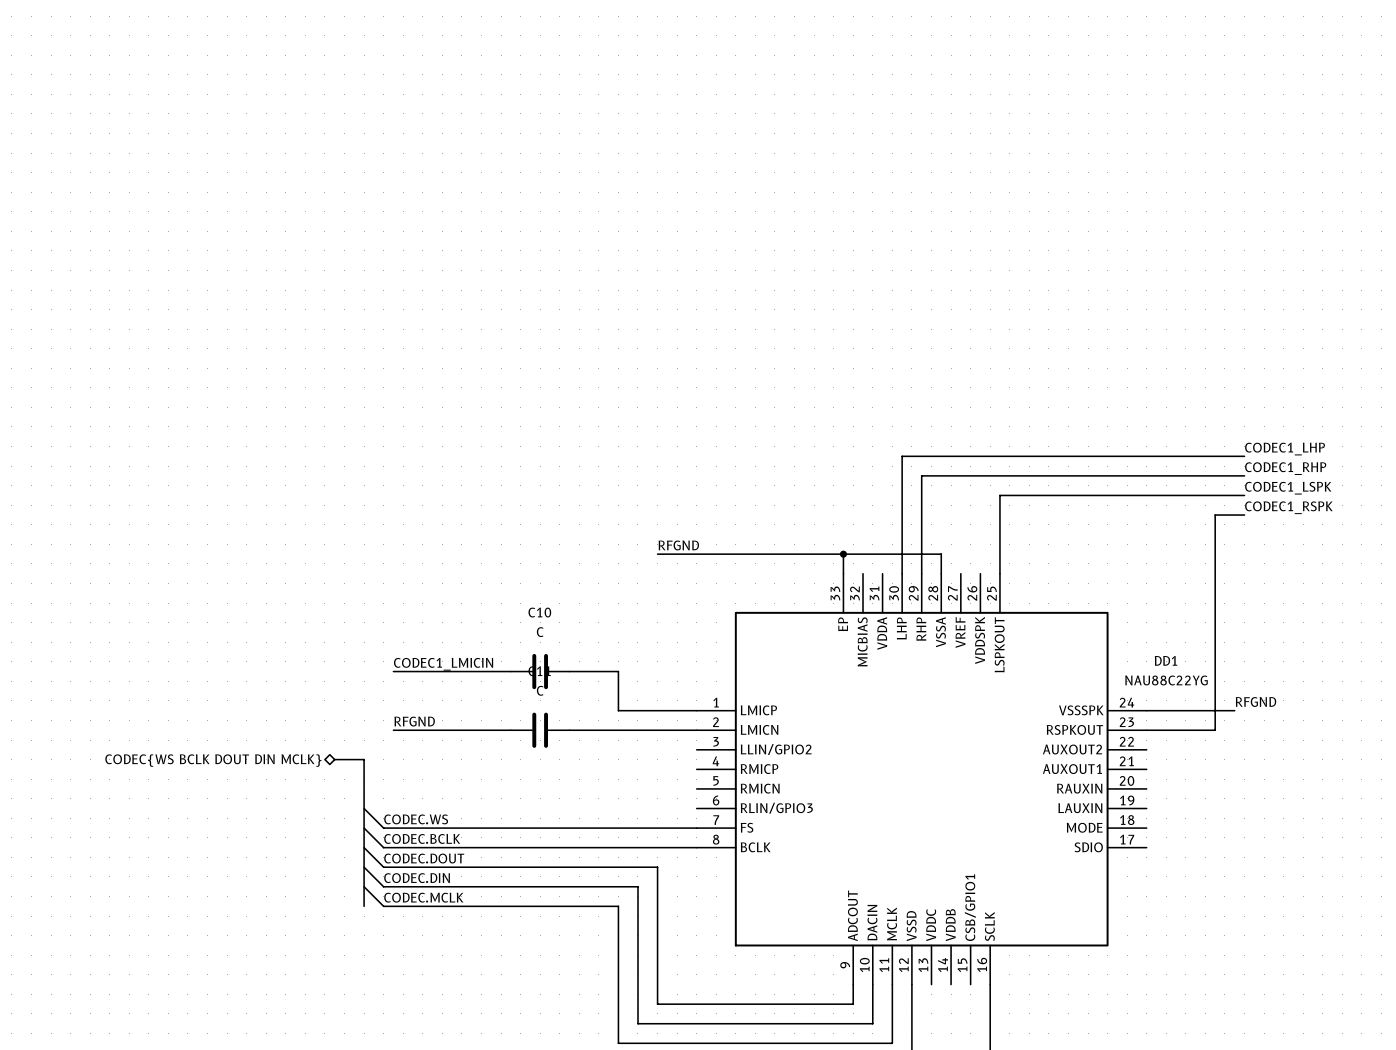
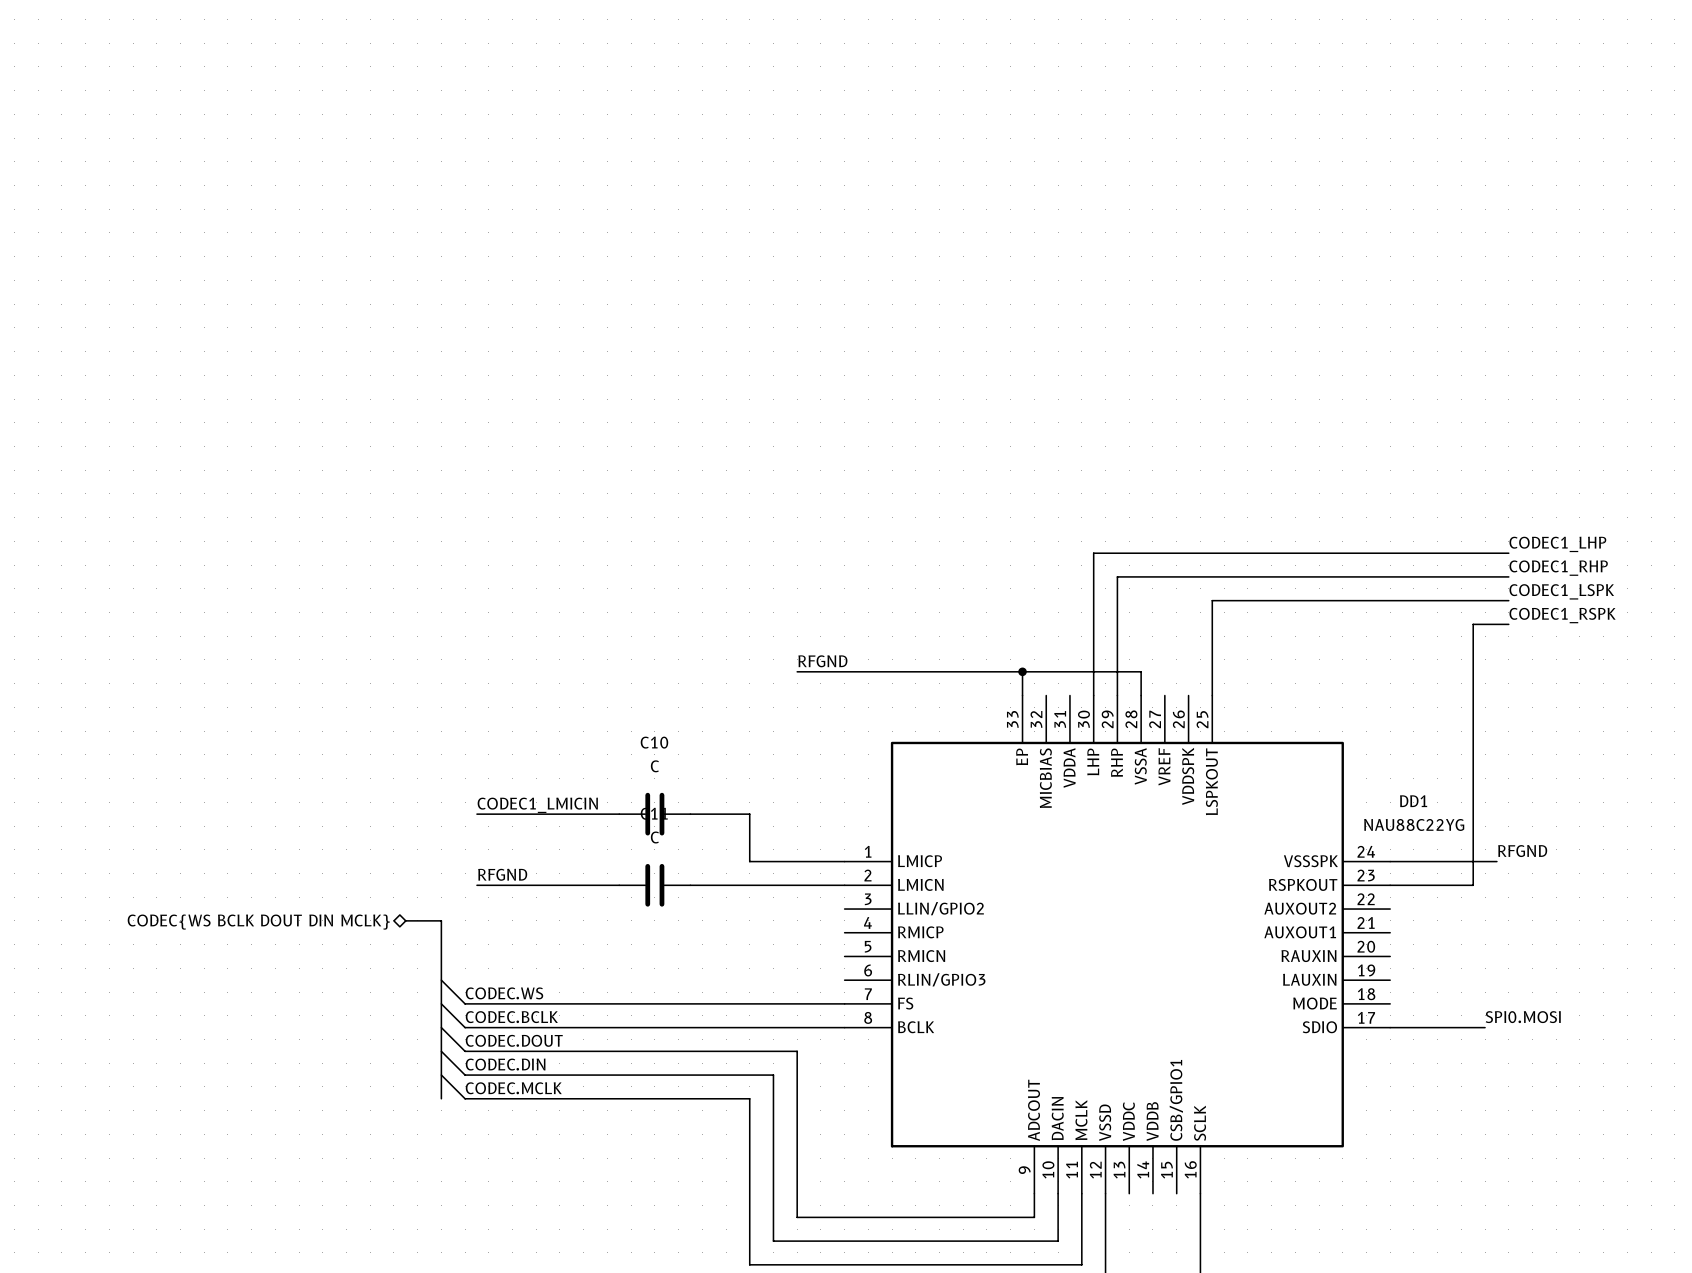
label: none -> SPI0.MOSI (1523, 1017)
wire: none -> (1390, 1027) (1485, 1027)

